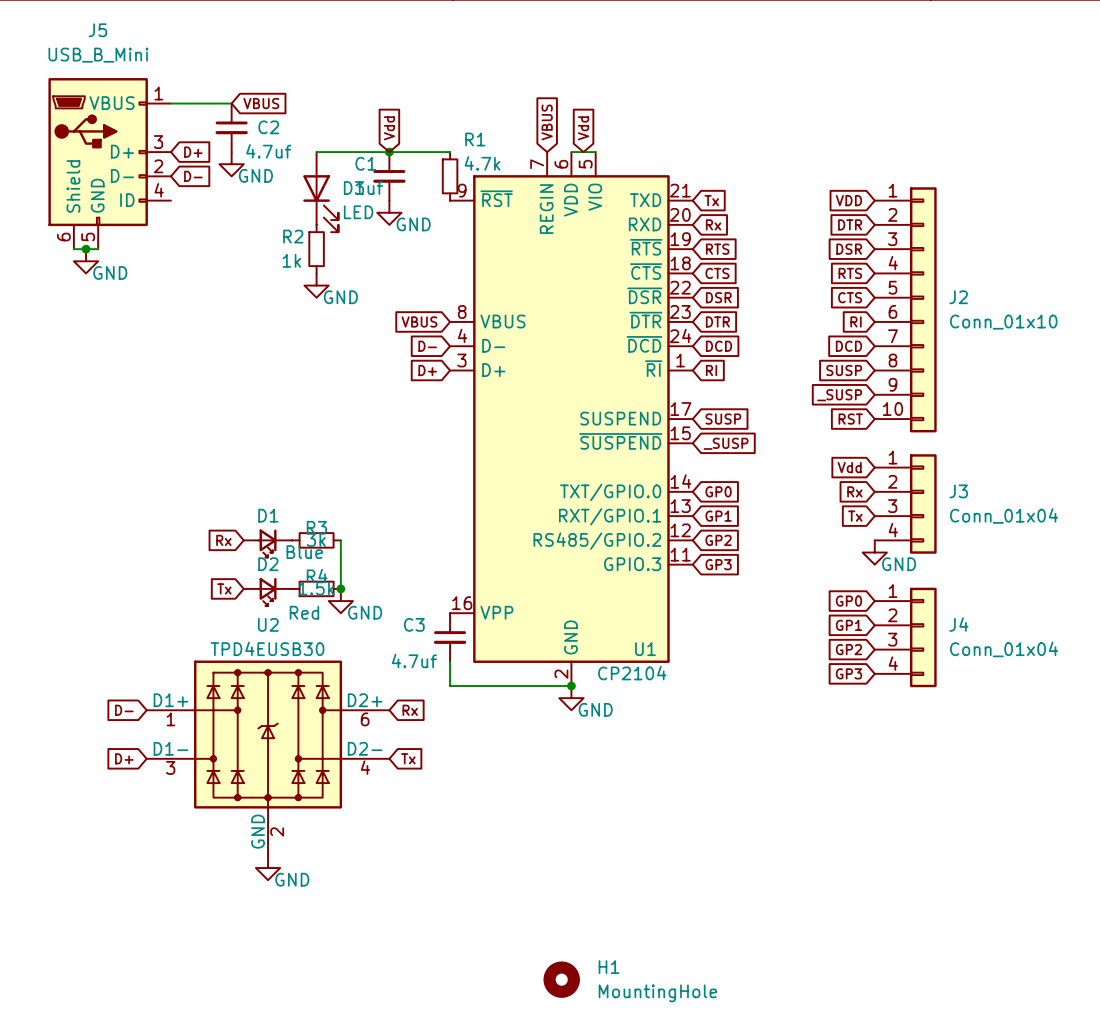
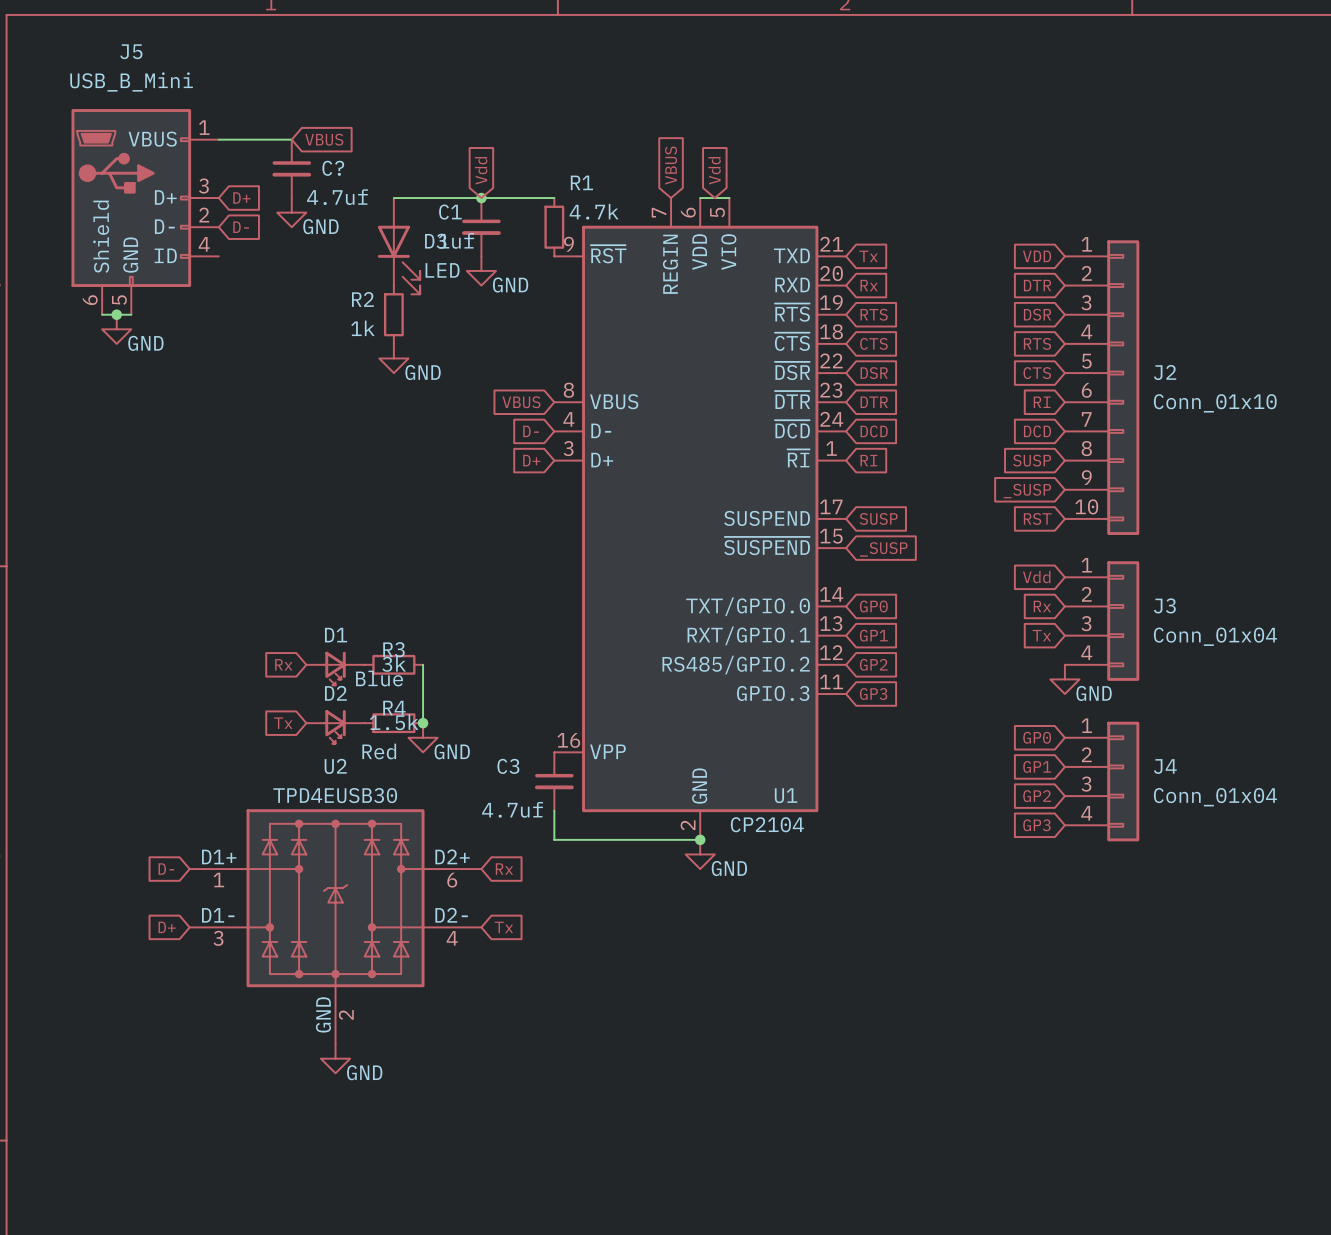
C2 name: C2 (268, 127) -> C? (333, 168)
H1: MountingHole (561, 979) -> none

